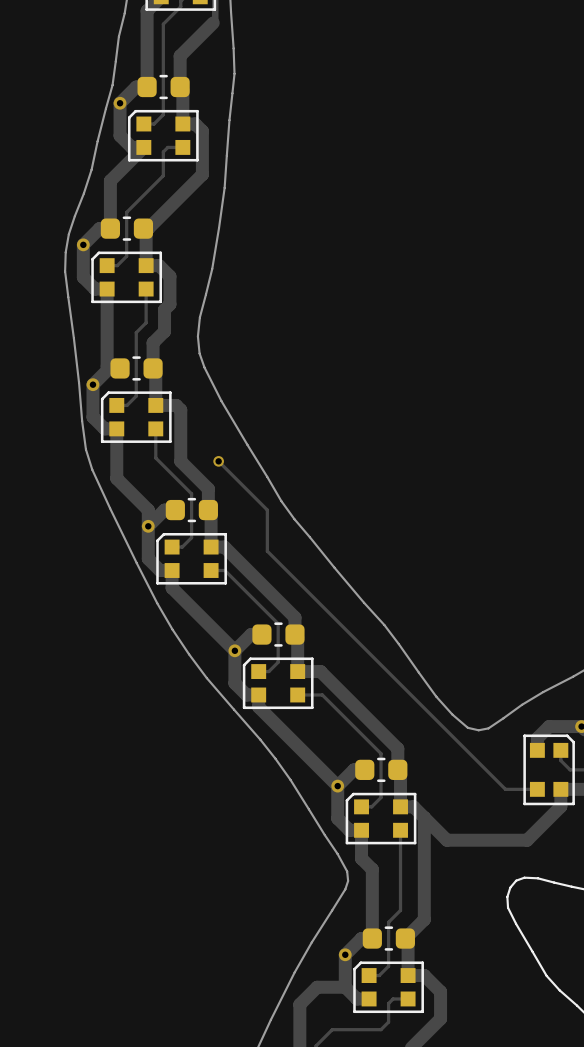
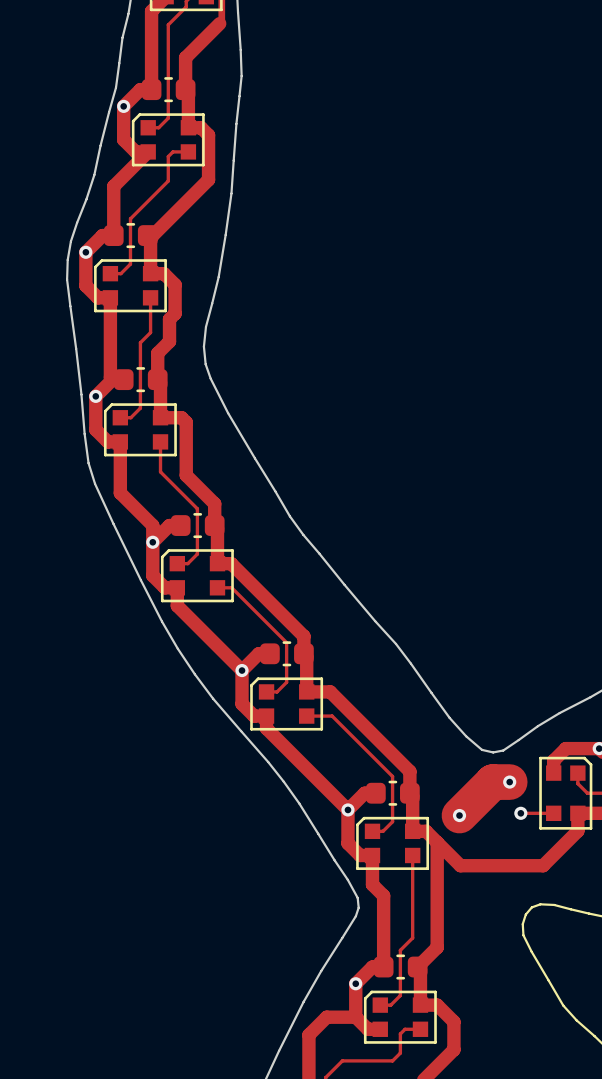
track: (218, 461) (267, 510) (267, 551) (505, 789) -> none
via: (218, 461) -> none
track: none -> (509, 782) (492, 782) (459, 815)
via: none -> (509, 782)
via: none -> (520, 813)
via: none -> (459, 815)

